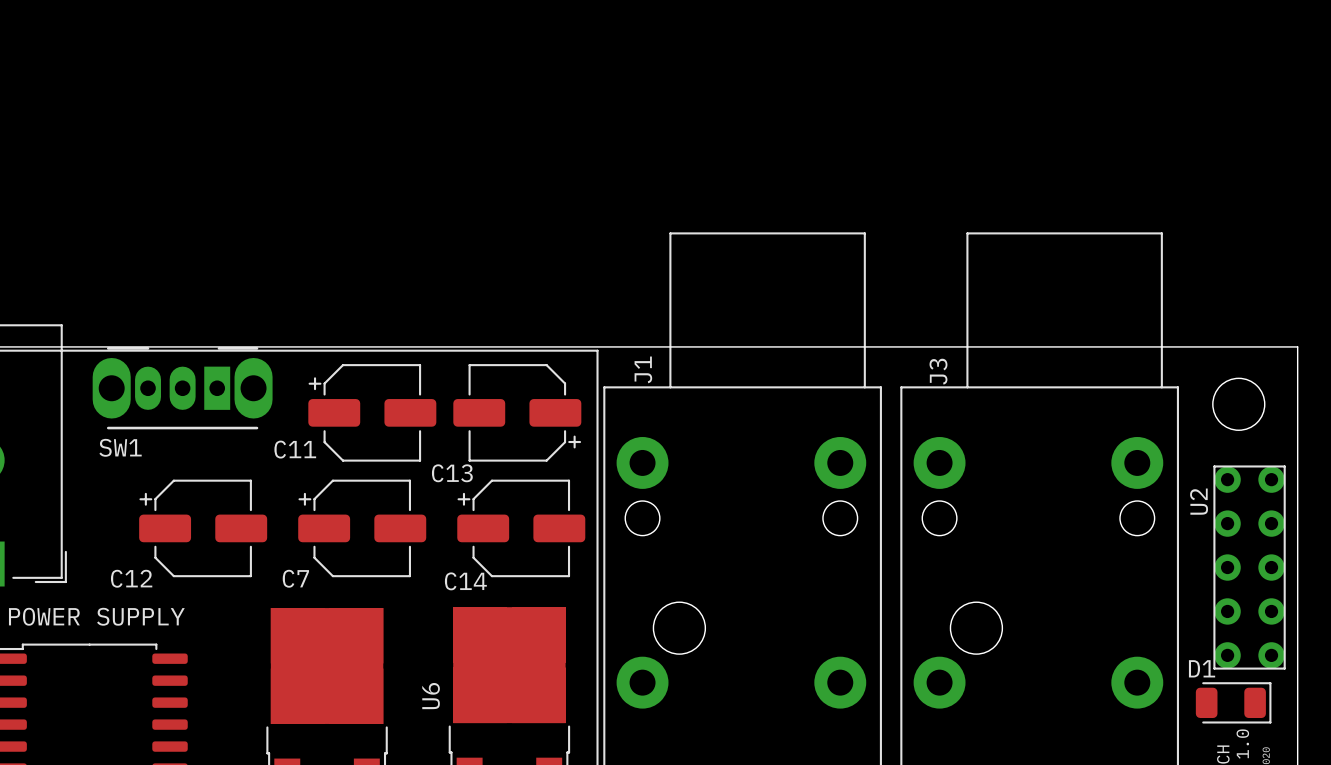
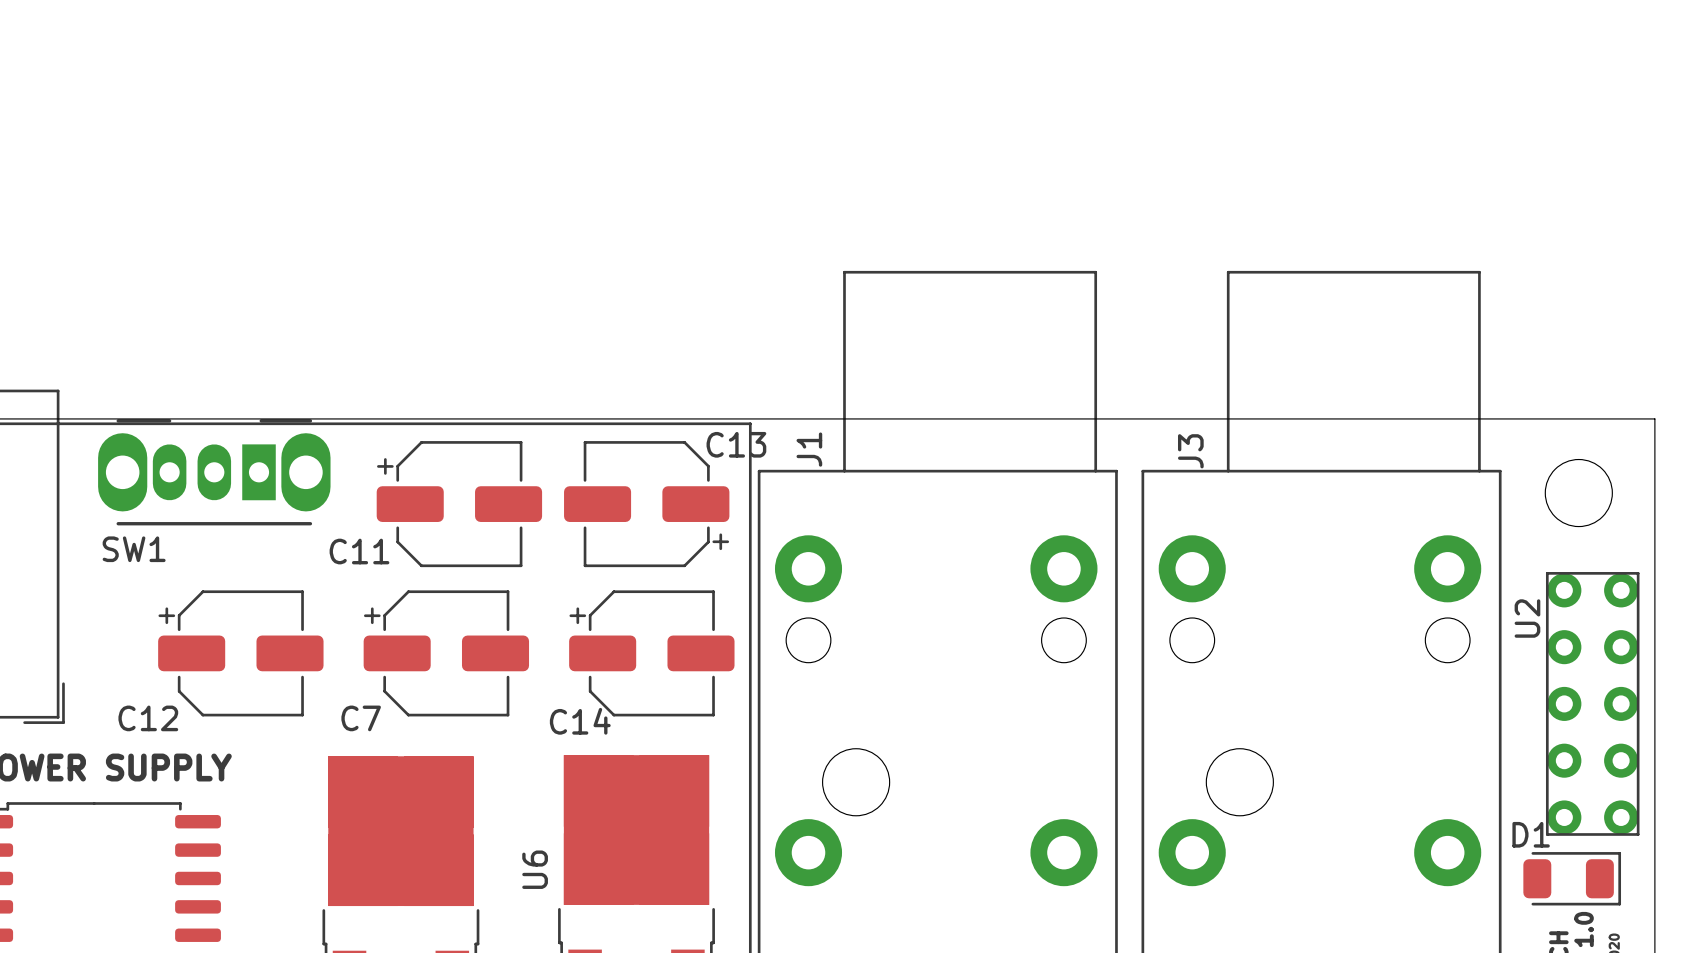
C13 name position: C13 (452, 473) -> C13 (736, 444)

